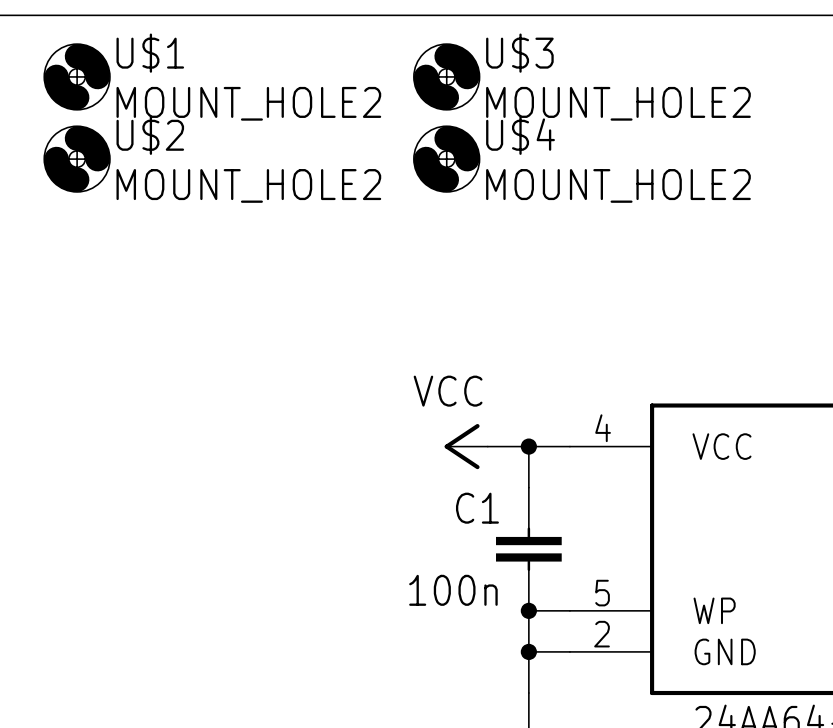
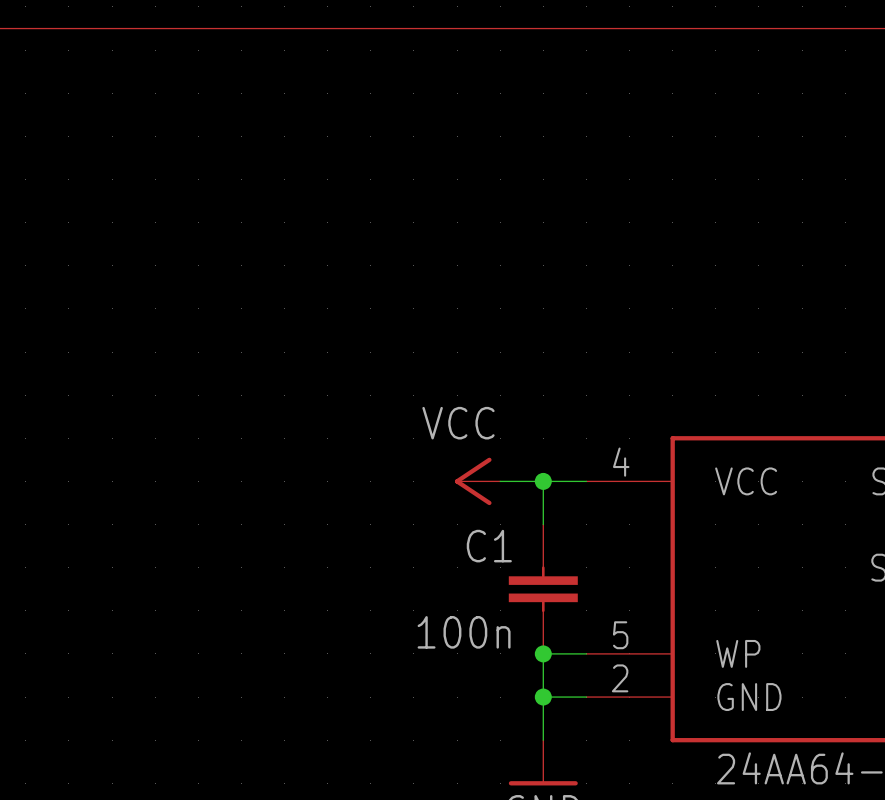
U$1: MOUNT_HOLE2 (77, 76) -> none
U$3: MOUNT_HOLE2 (446, 76) -> none
U$2: MOUNT_HOLE2 (77, 159) -> none
U$4: MOUNT_HOLE2 (446, 159) -> none

